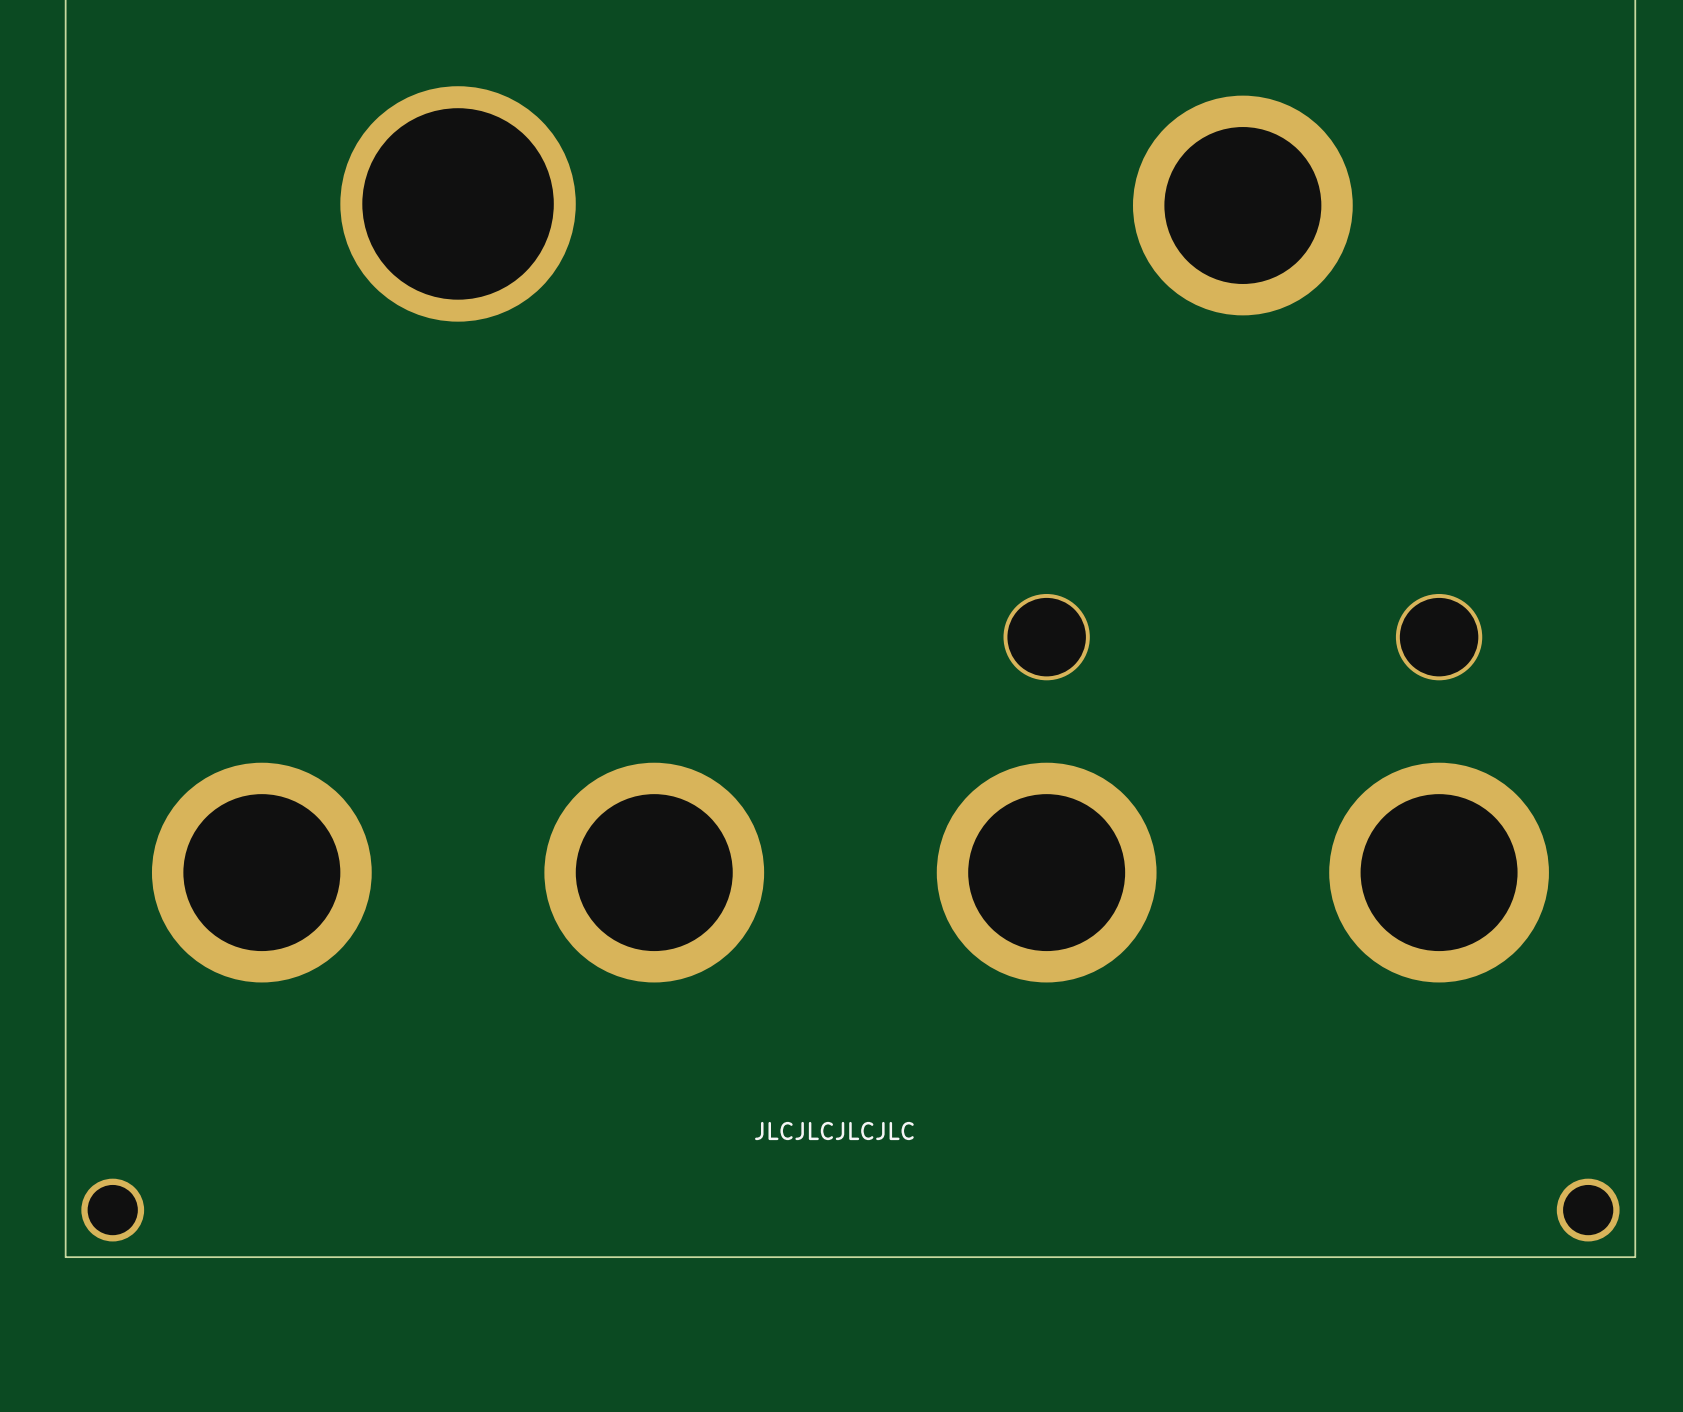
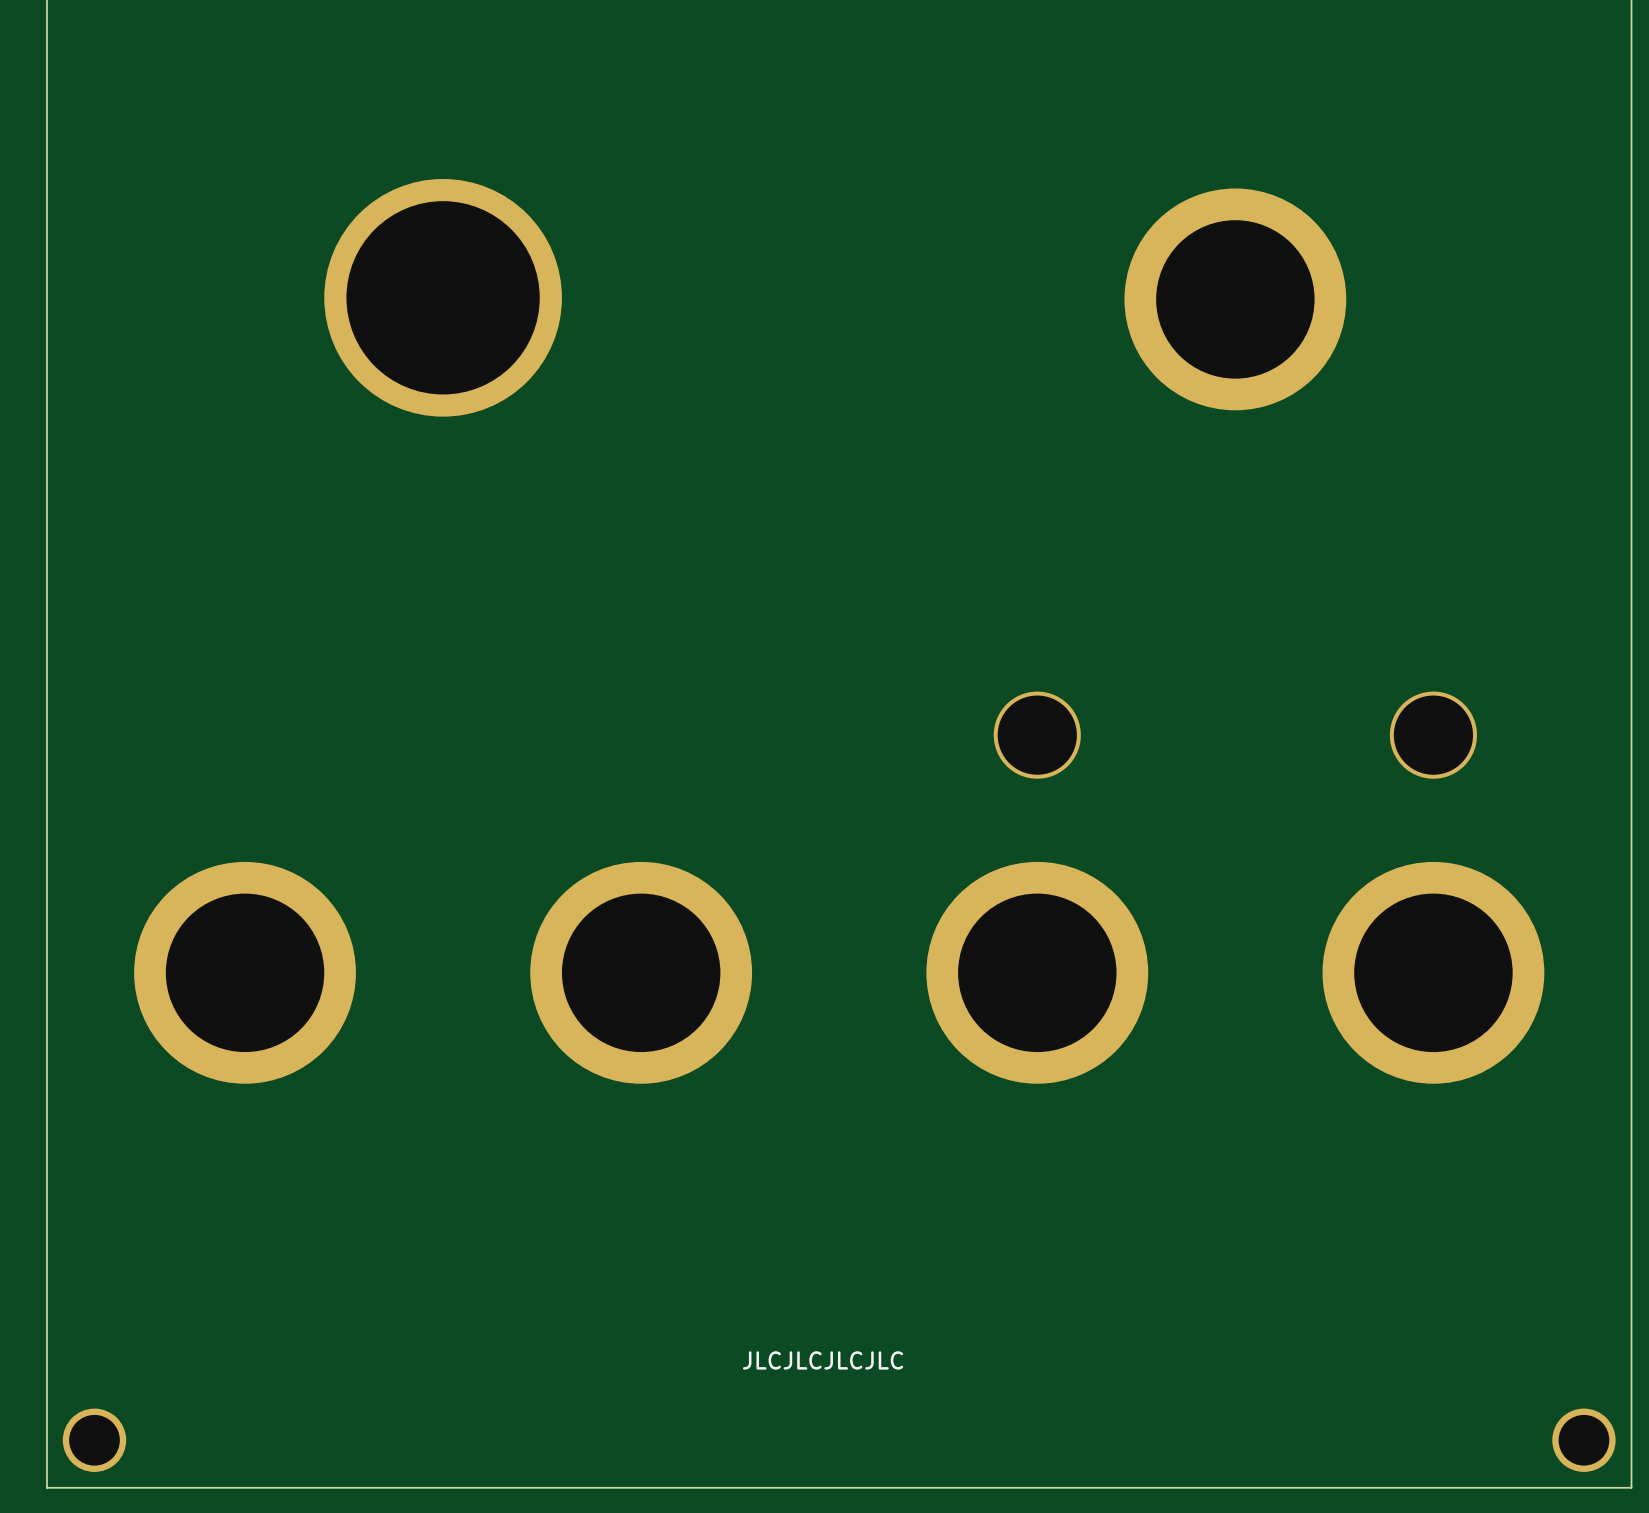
text position: JLCJLCJLCJLC (834, 1131) -> JLCJLCJLCJLC (823, 1360)
part position: (112, 1210) -> (94, 1440)
part position: (1588, 1210) -> (1583, 1440)
board edge: (1635, 1257) (65, 1257) -> (1631, 1361) (1631, 1487) (46, 1487) (46, 1361)

